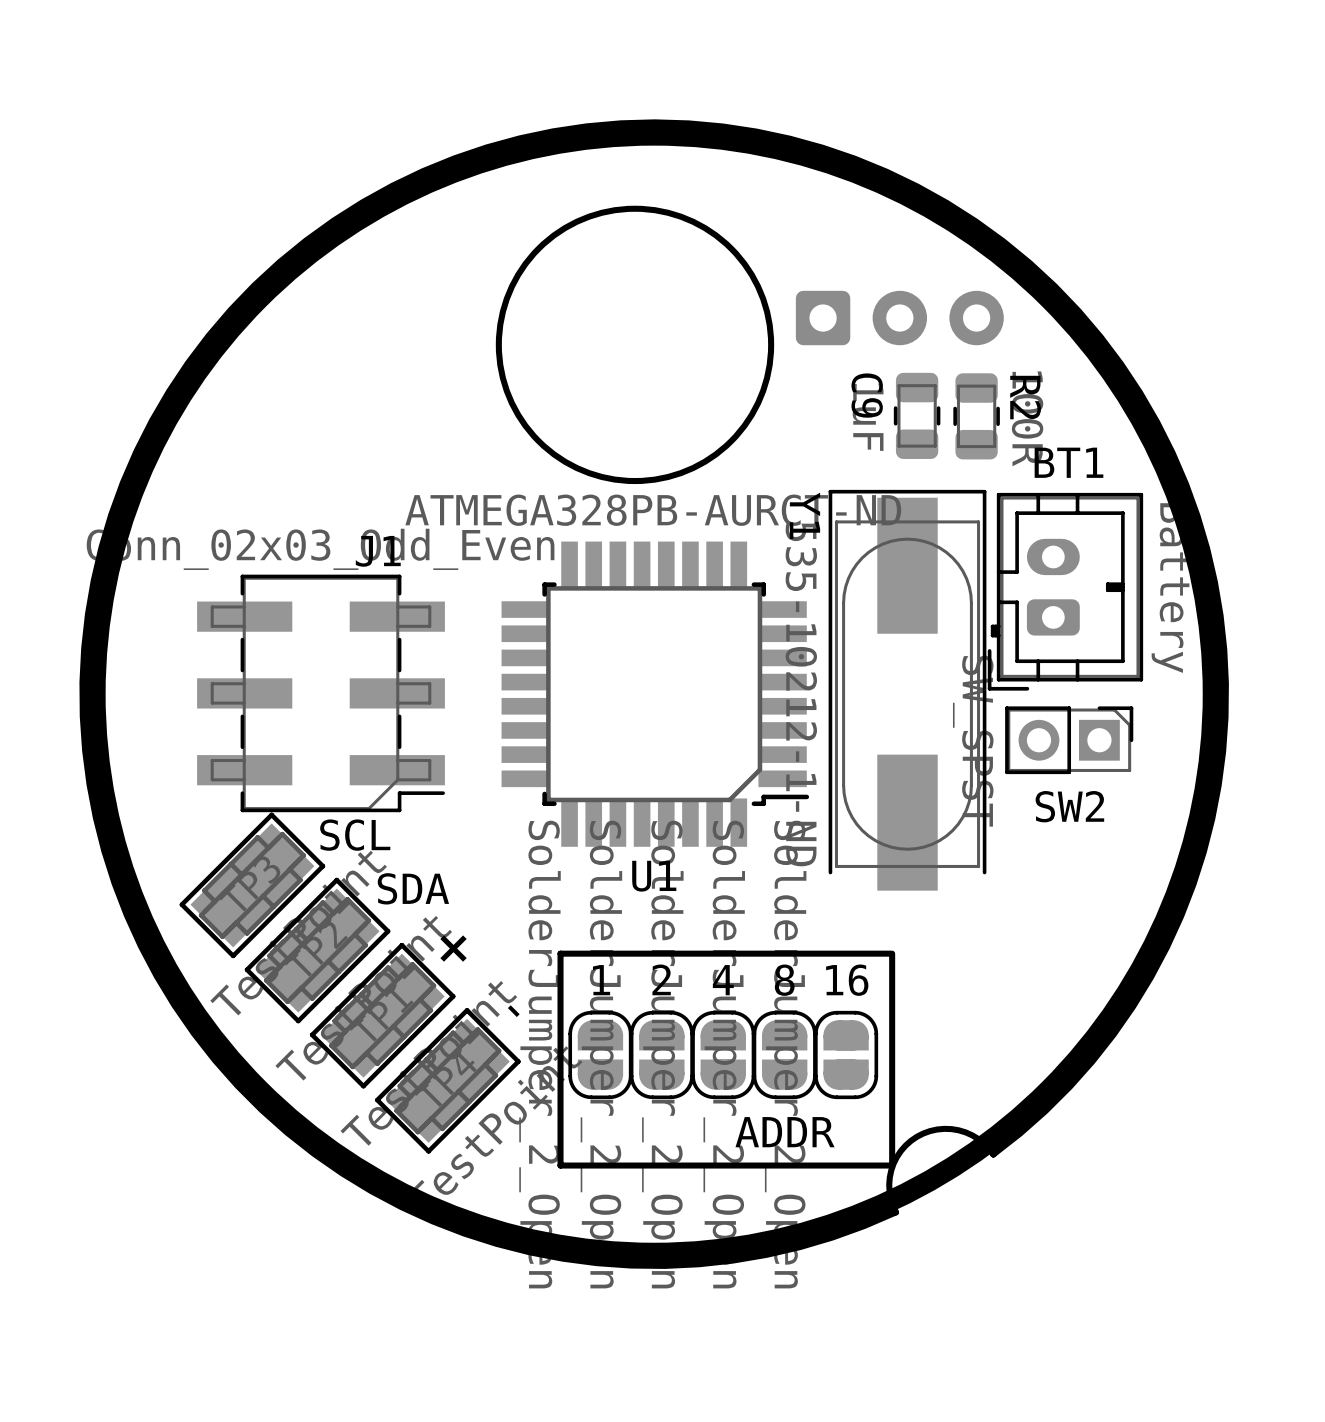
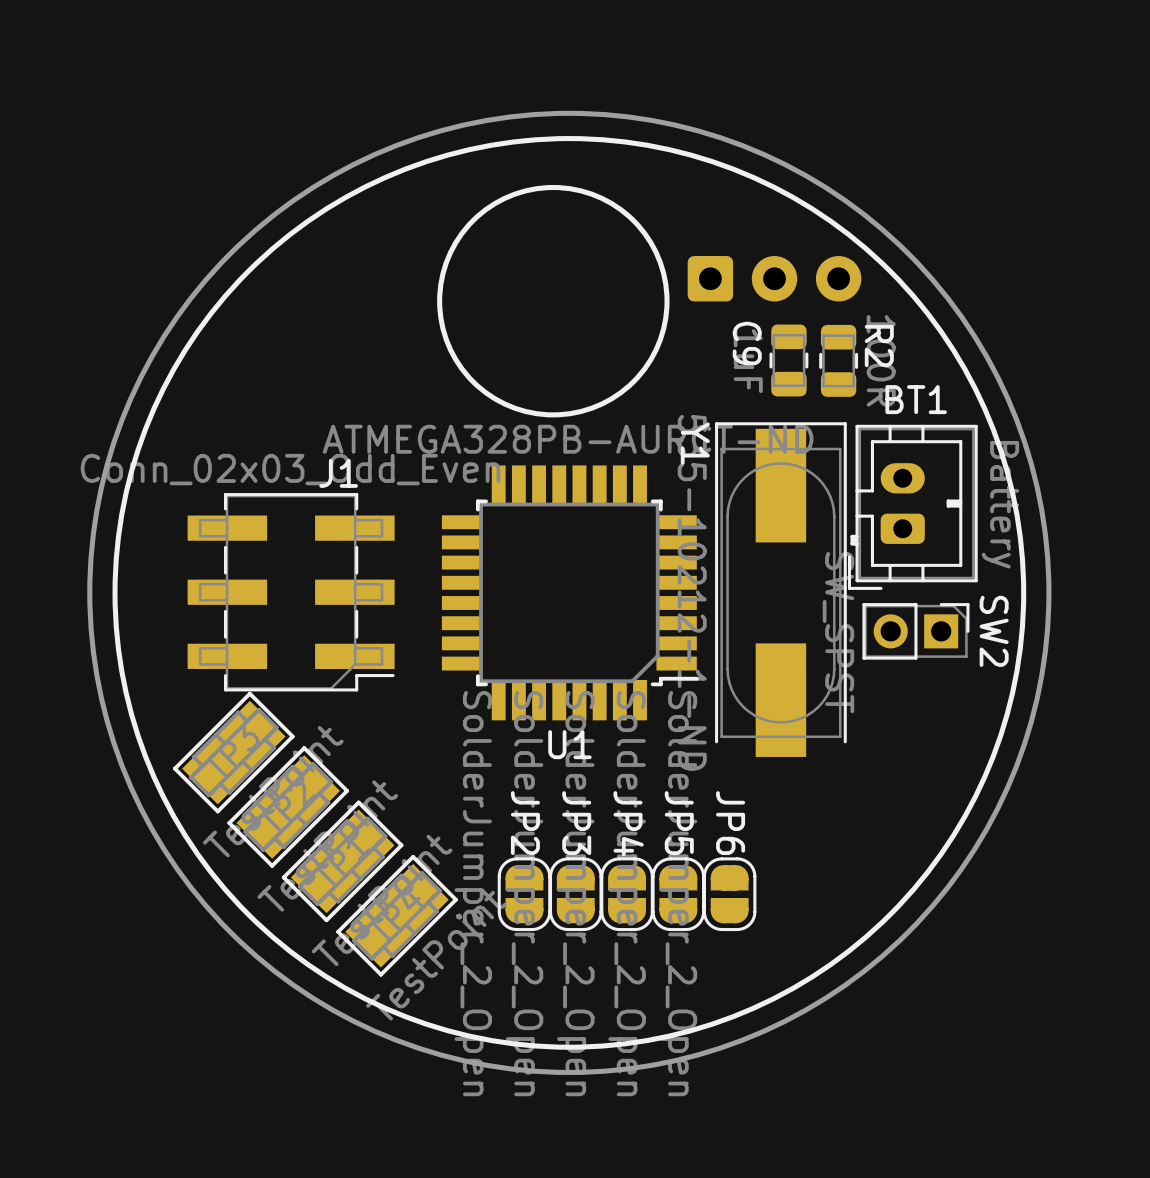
round board edge: none -> [87, 110, 1052, 1075]
drawing shape: [84, 124, 1224, 1264] -> [112, 136, 1027, 1050]
SW2 name rotation: 0° (1069, 806) -> 90° clockwise (994, 631)
text: SCL (355, 835) -> none
text: SDA (413, 888) -> none
text: + (453, 948) -> none
line: (892, 953) (892, 1165) (560, 1165) (560, 953) (890, 953) -> none
JP2 name: none -> JP2 (525, 823)
JP5 name: none -> JP5 (679, 823)
JP3 name: none -> JP3 (576, 823)
JP4 name: none -> JP4 (628, 823)
JP6 name: none -> JP6 (730, 823)
text: 2 (661, 979) -> none
text: 1 (601, 980) -> none
text: 4 (723, 980) -> none
text: 8 (784, 980) -> none
text: 16 (847, 980) -> none
text: - (513, 1011) -> none
text: ADDR (785, 1132) -> none
board edge: (993, 1154) (1020, 1133) (1069, 1086) (1092, 1061) (1133, 1006) (1166, 947) (1181, 916) (1203, 852) (1218, 785) (1223, 751) (1225, 683) (1220, 615) (1207, 548) (1197, 515) (1172, 452) (1140, 392) (1100, 336) (1078, 310) (1029, 263) (975, 221) (947, 203) (886, 171) (822, 147) (789, 138) (722, 126) (688, 123) (620, 123) (586, 126) (519, 138) (454, 158) (392, 185) (333, 220) (305, 240) (254, 285) (208, 335) (187, 363) (151, 420) (122, 482) (111, 514) (101, 547) (87, 614) (84, 648) (82, 716) (89, 784) (95, 817) (114, 883) (140, 946) (174, 1005) (193, 1033) (237, 1085) (287, 1132) (341, 1173) (371, 1191) (401, 1207) (464, 1233) (496, 1243) (563, 1258) (630, 1265) (699, 1264) (766, 1254) (799, 1247) (832, 1237) (895, 1212) (889, 1191) (891, 1170) (900, 1151) (911, 1140) (923, 1133) (944, 1128) (965, 1132) (984, 1143) (989, 1148) (993, 1154) -> none

